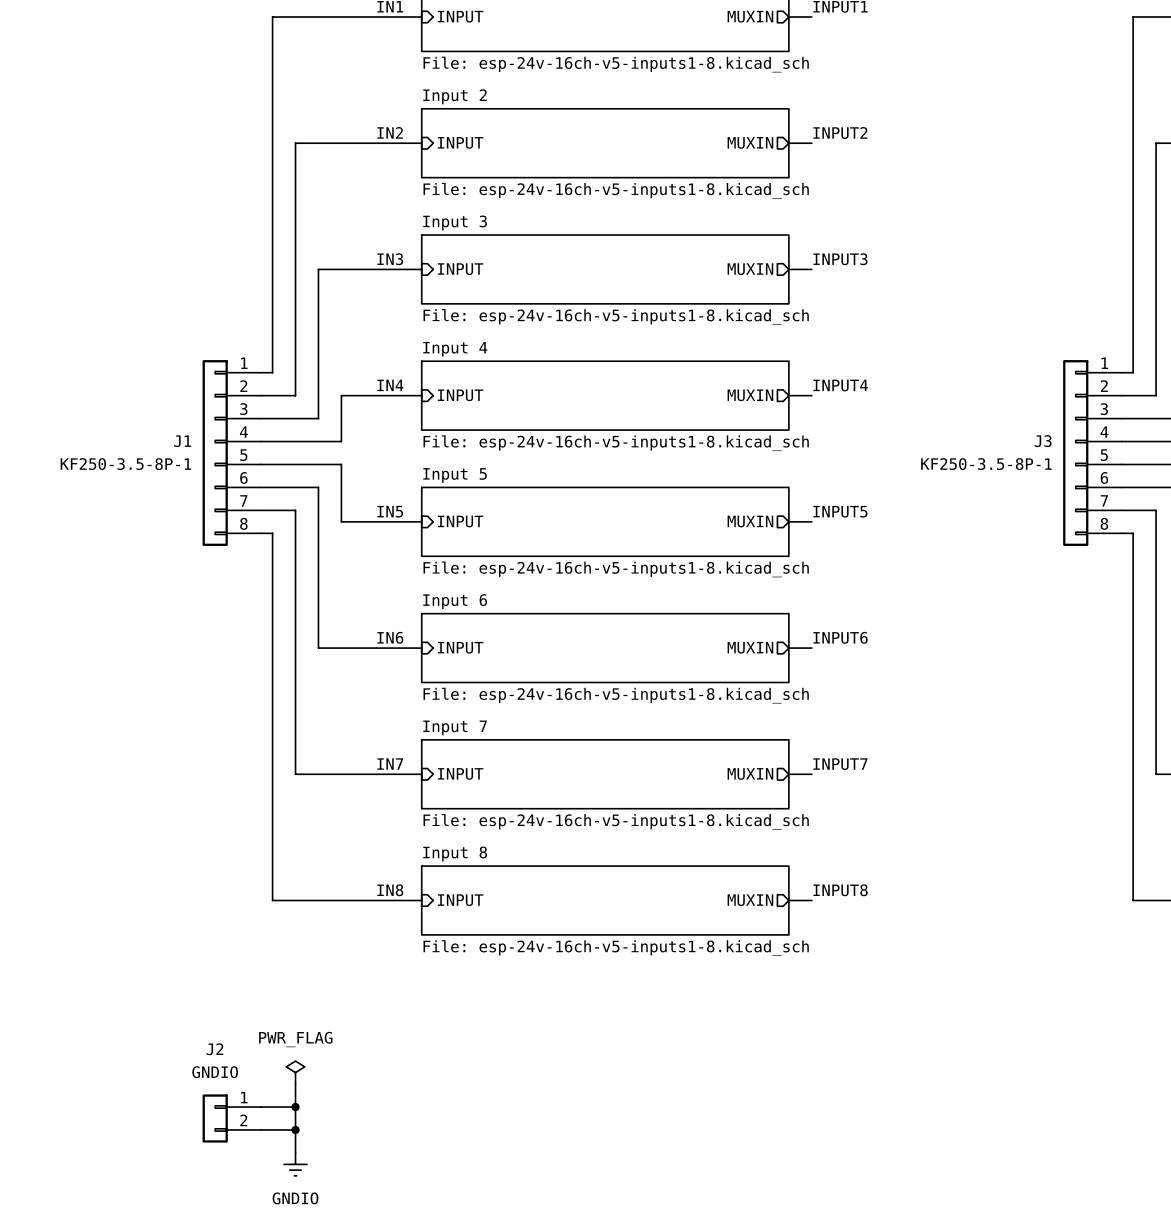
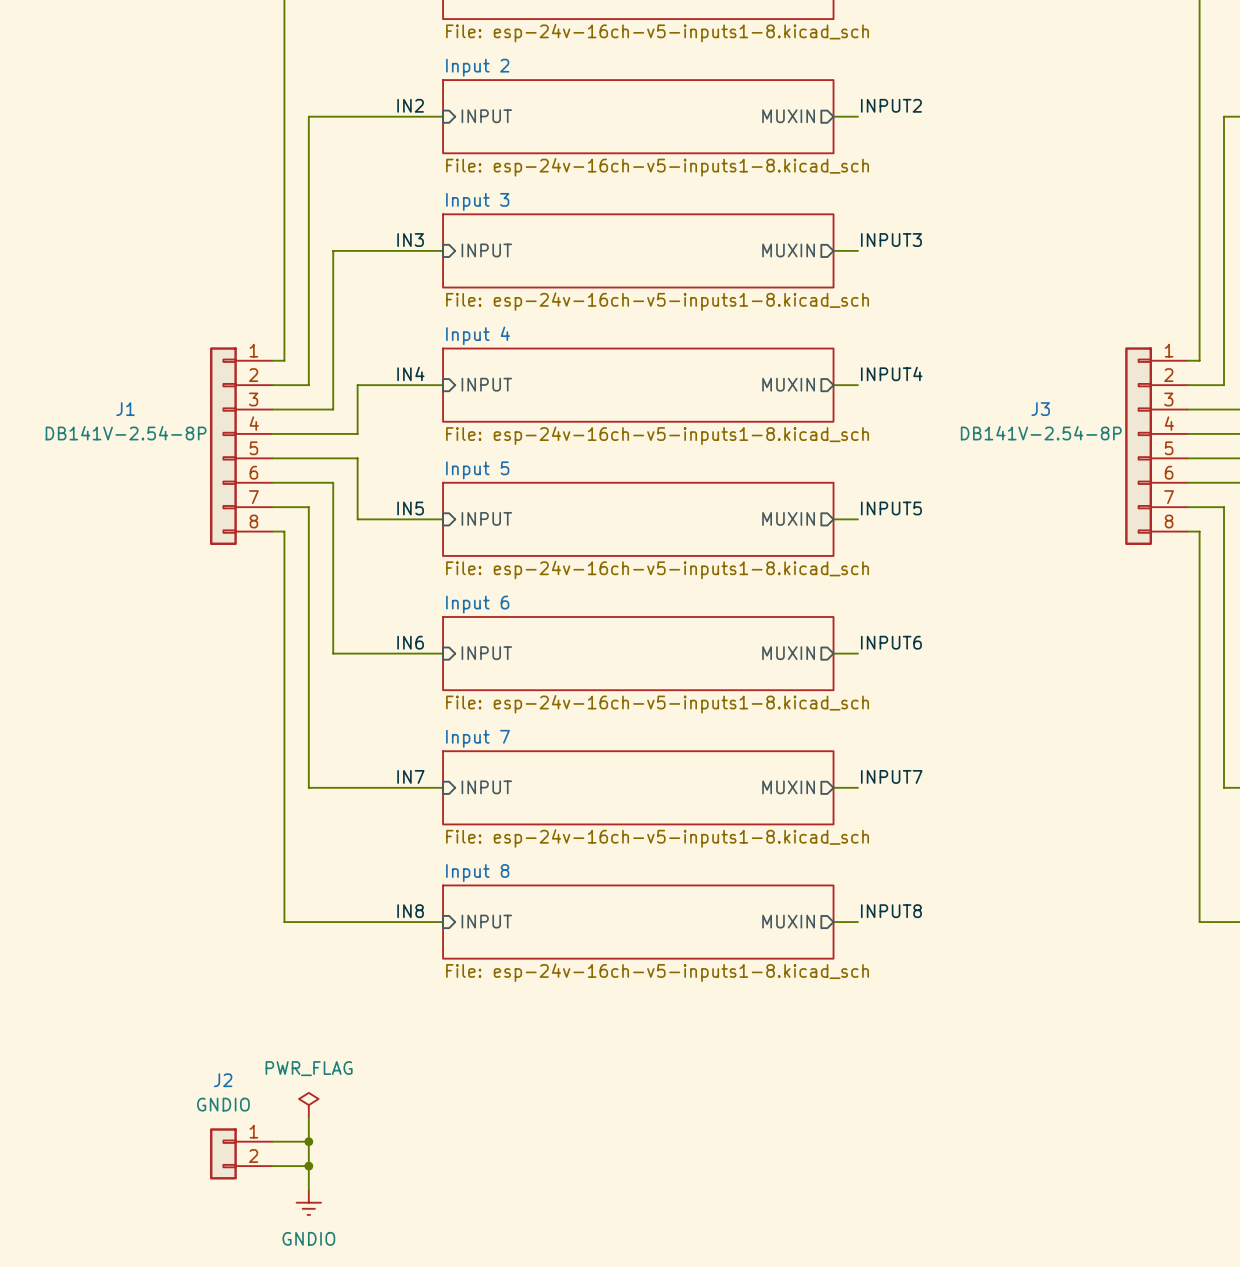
J1 name position: J1 (182, 441) -> J1 (125, 409)
J3 name position: J3 (1043, 441) -> J3 (1040, 409)
J1 value: KF250-3.5-8P-1 (125, 464) -> DB141V-2.54-8P (126, 433)
J3 value: KF250-3.5-8P-1 (986, 464) -> DB141V-2.54-8P (1041, 433)

